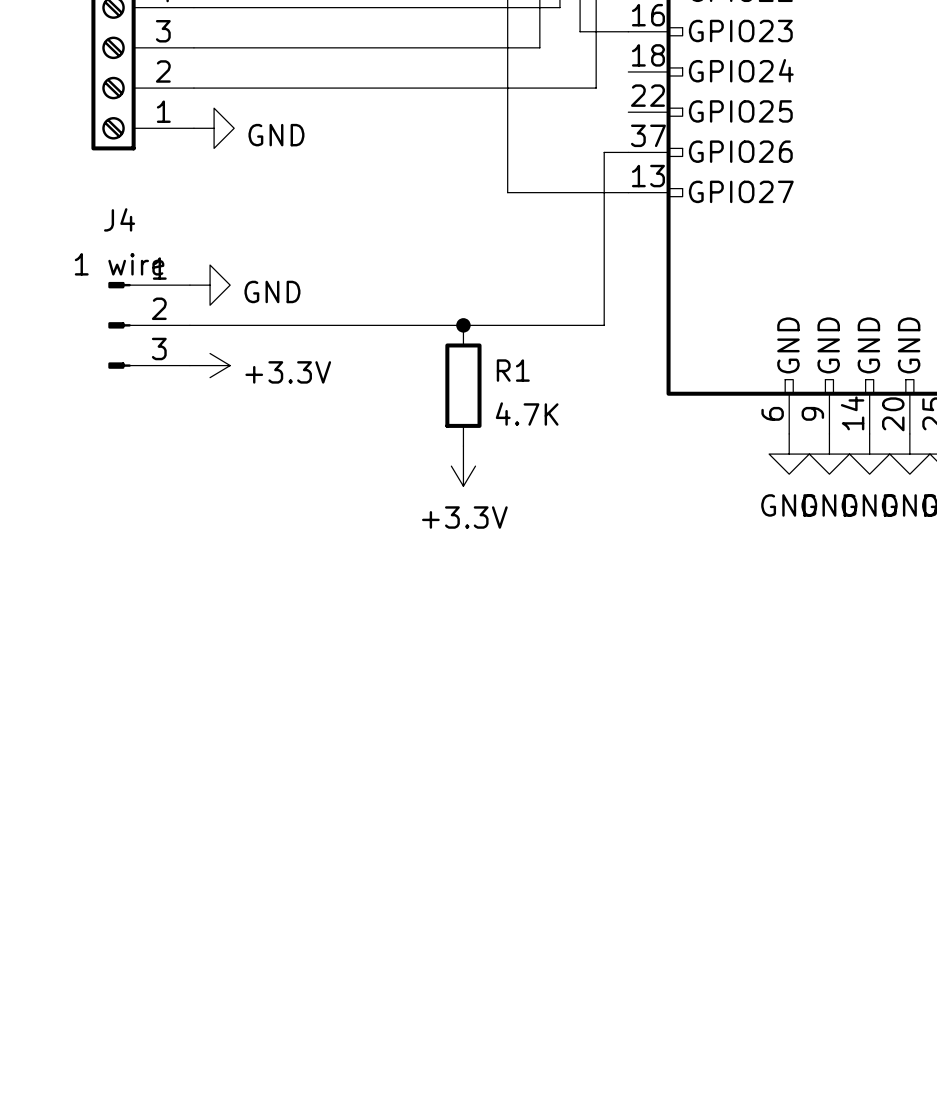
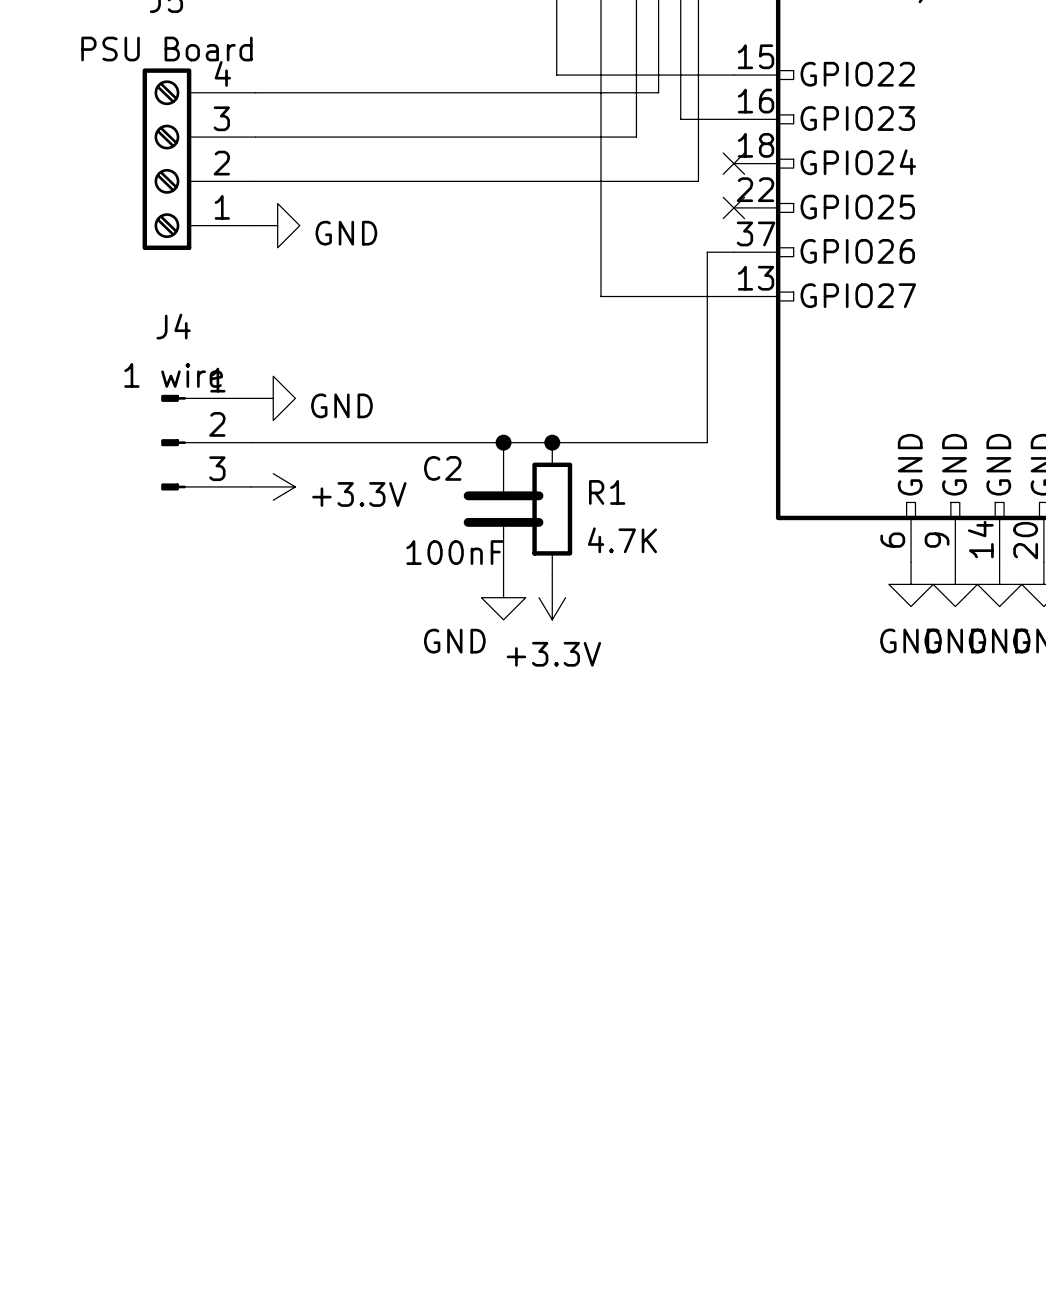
no-connect mark: none -> (733, 163)
no-connect mark: none -> (733, 207)
junction: none -> (503, 442)
C2: none -> 100nF (503, 509)
power symbol: none -> GND (503, 597)

